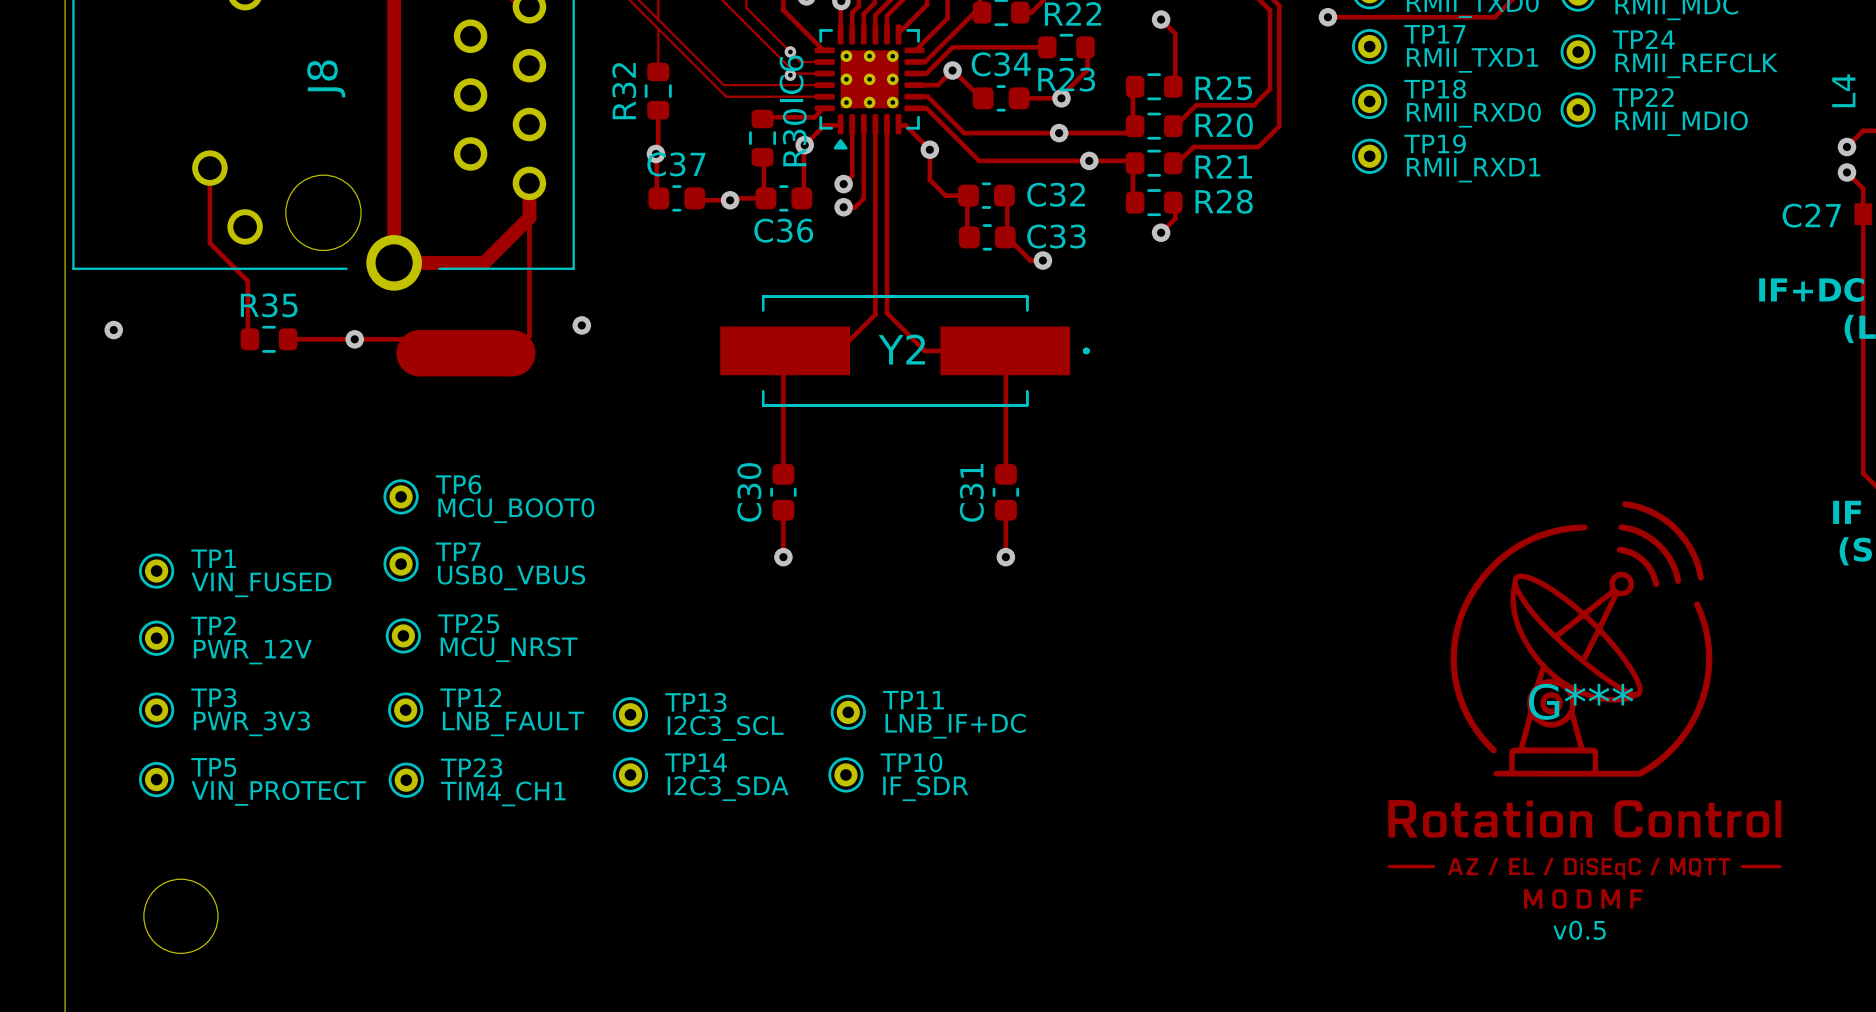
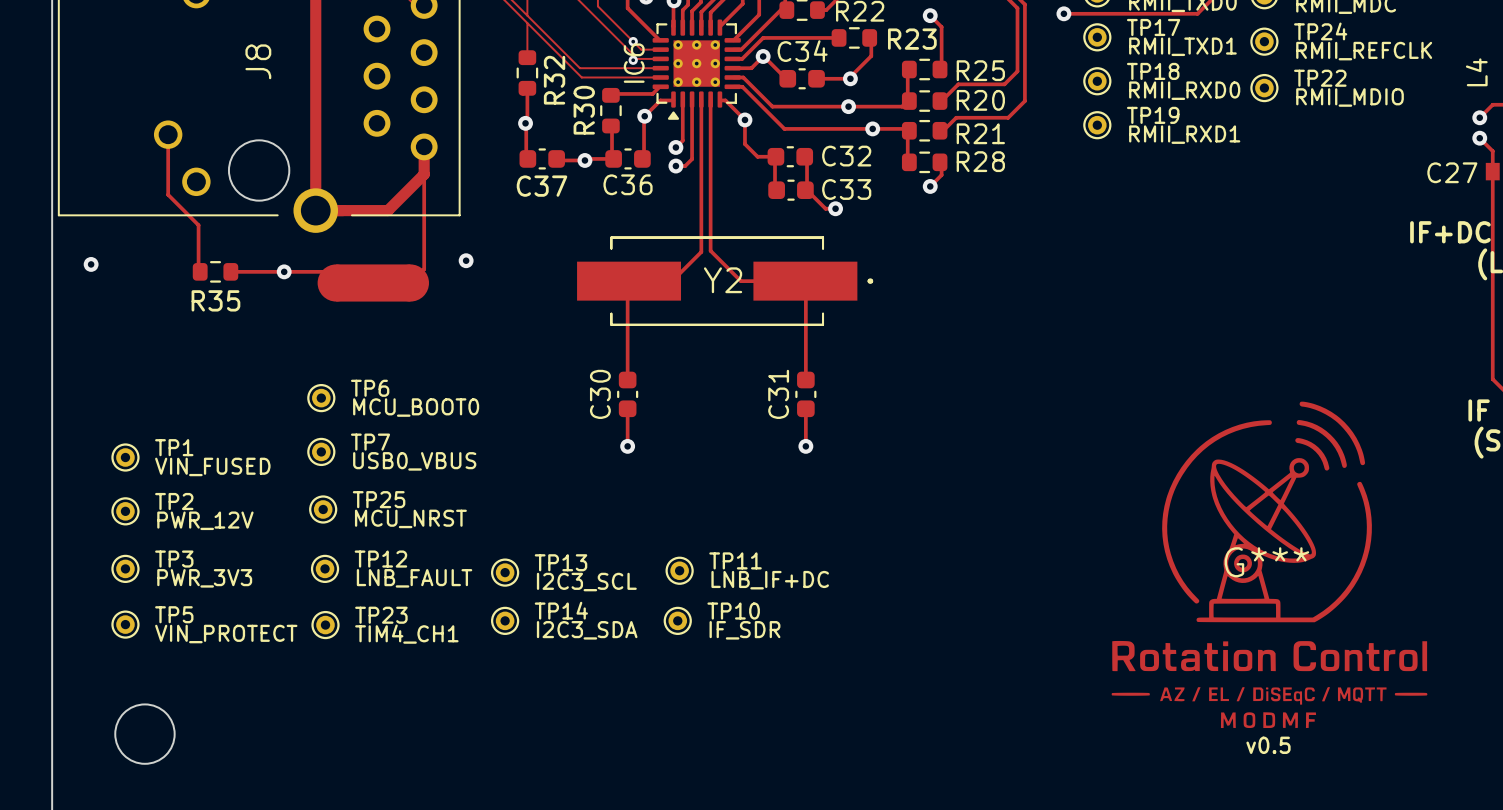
R23 name position: R23 (1066, 79) -> R23 (912, 39)
R32 name position: R32 (624, 91) -> R32 (554, 80)
R30 name position: R30 (794, 137) -> R30 (584, 110)
C37 name position: C37 (676, 164) -> C37 (541, 186)
R35 name position: R35 (269, 305) -> R35 (215, 300)

